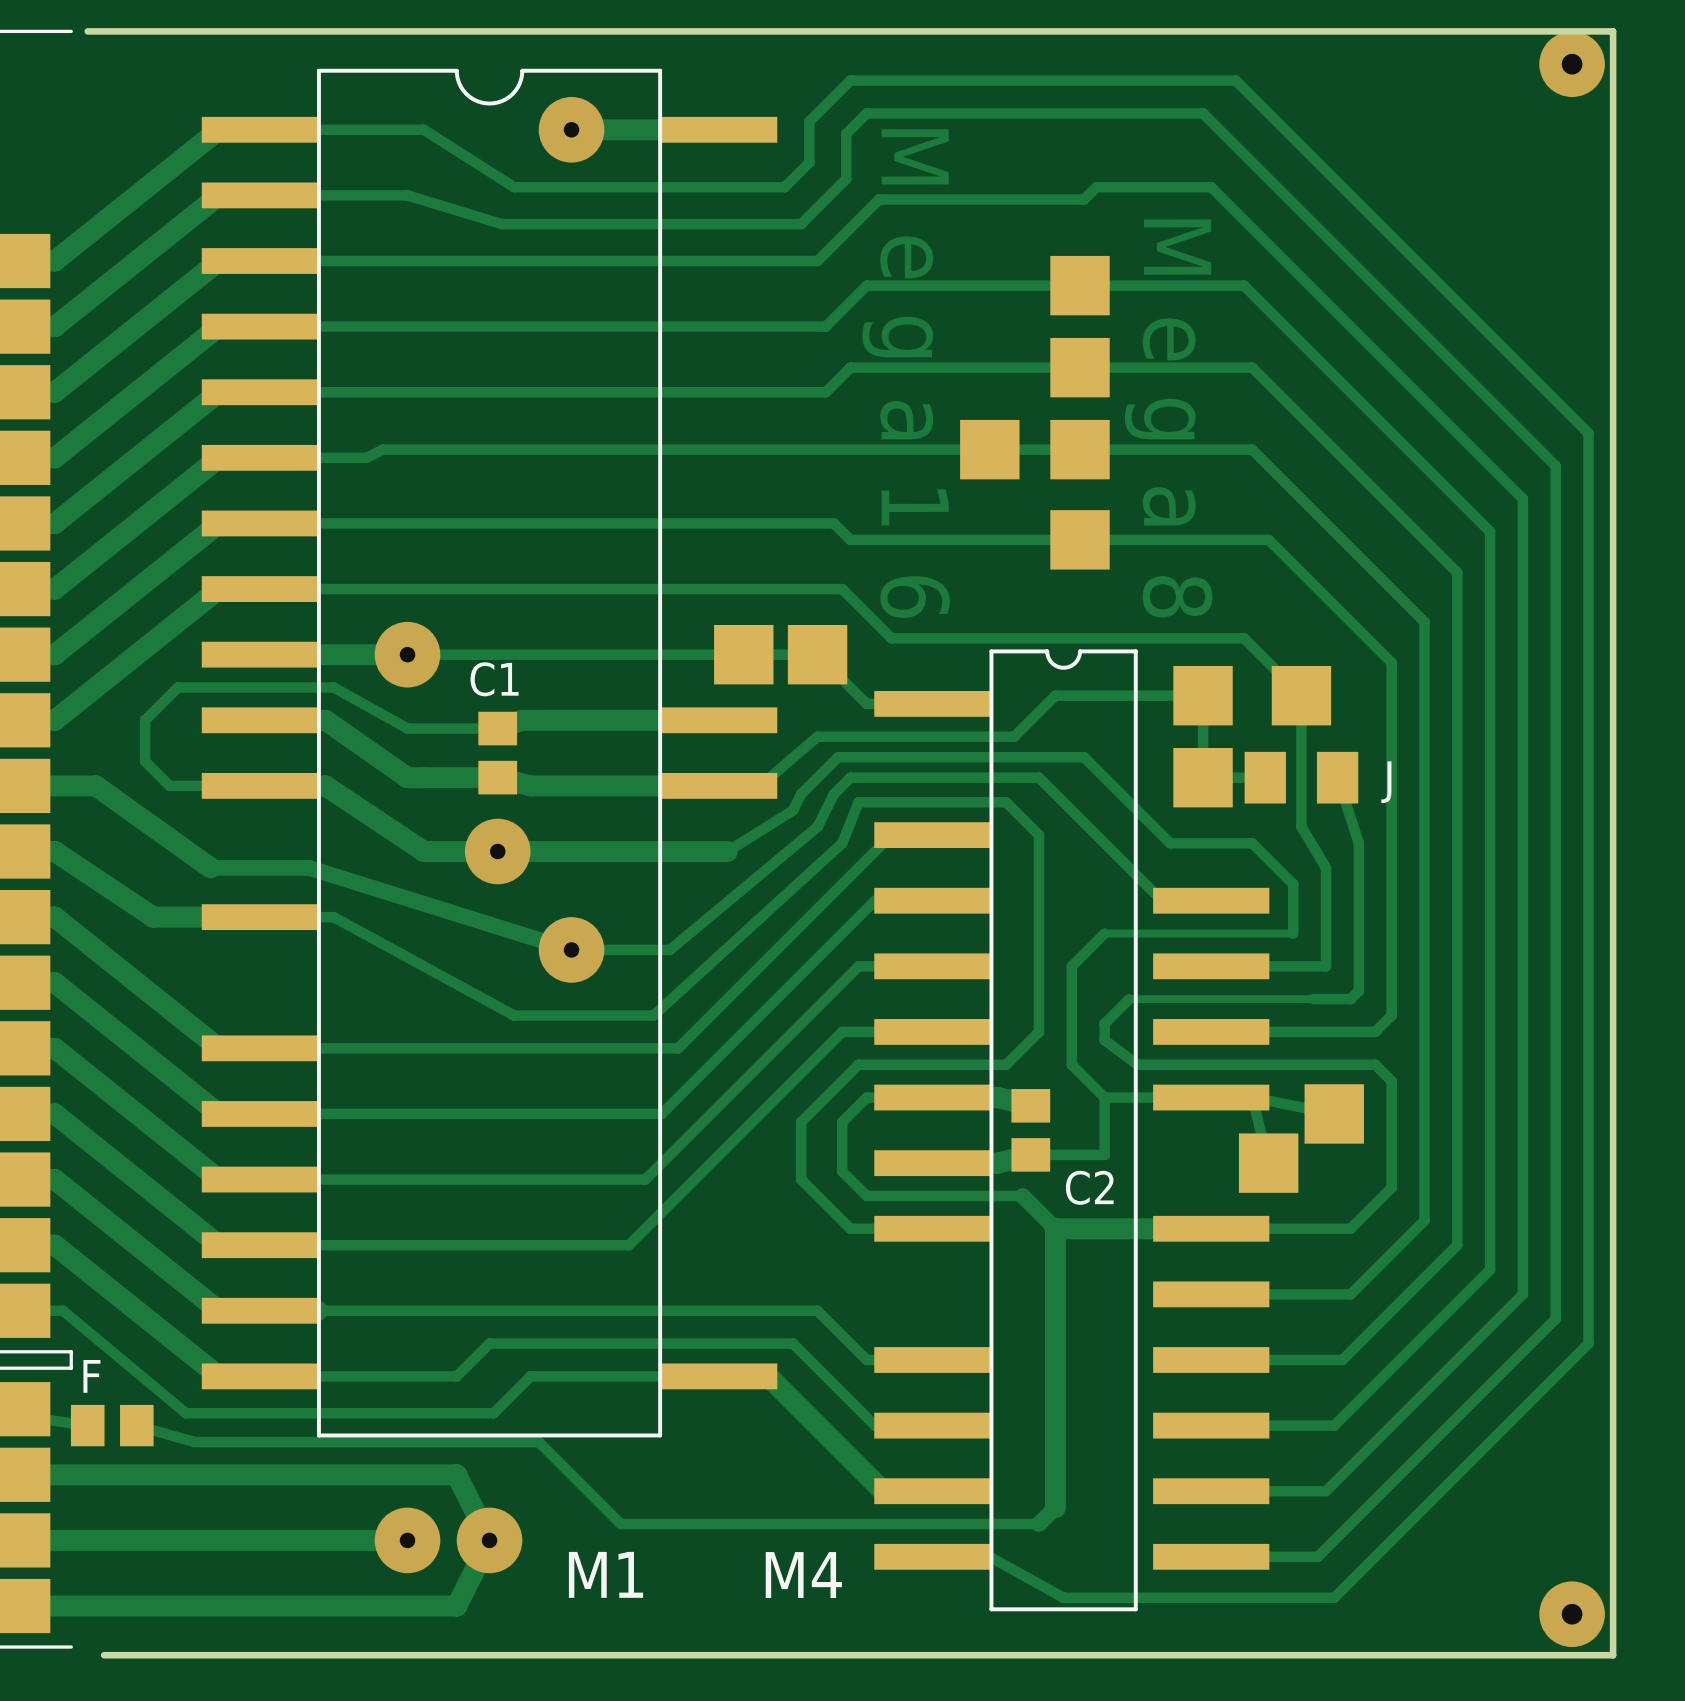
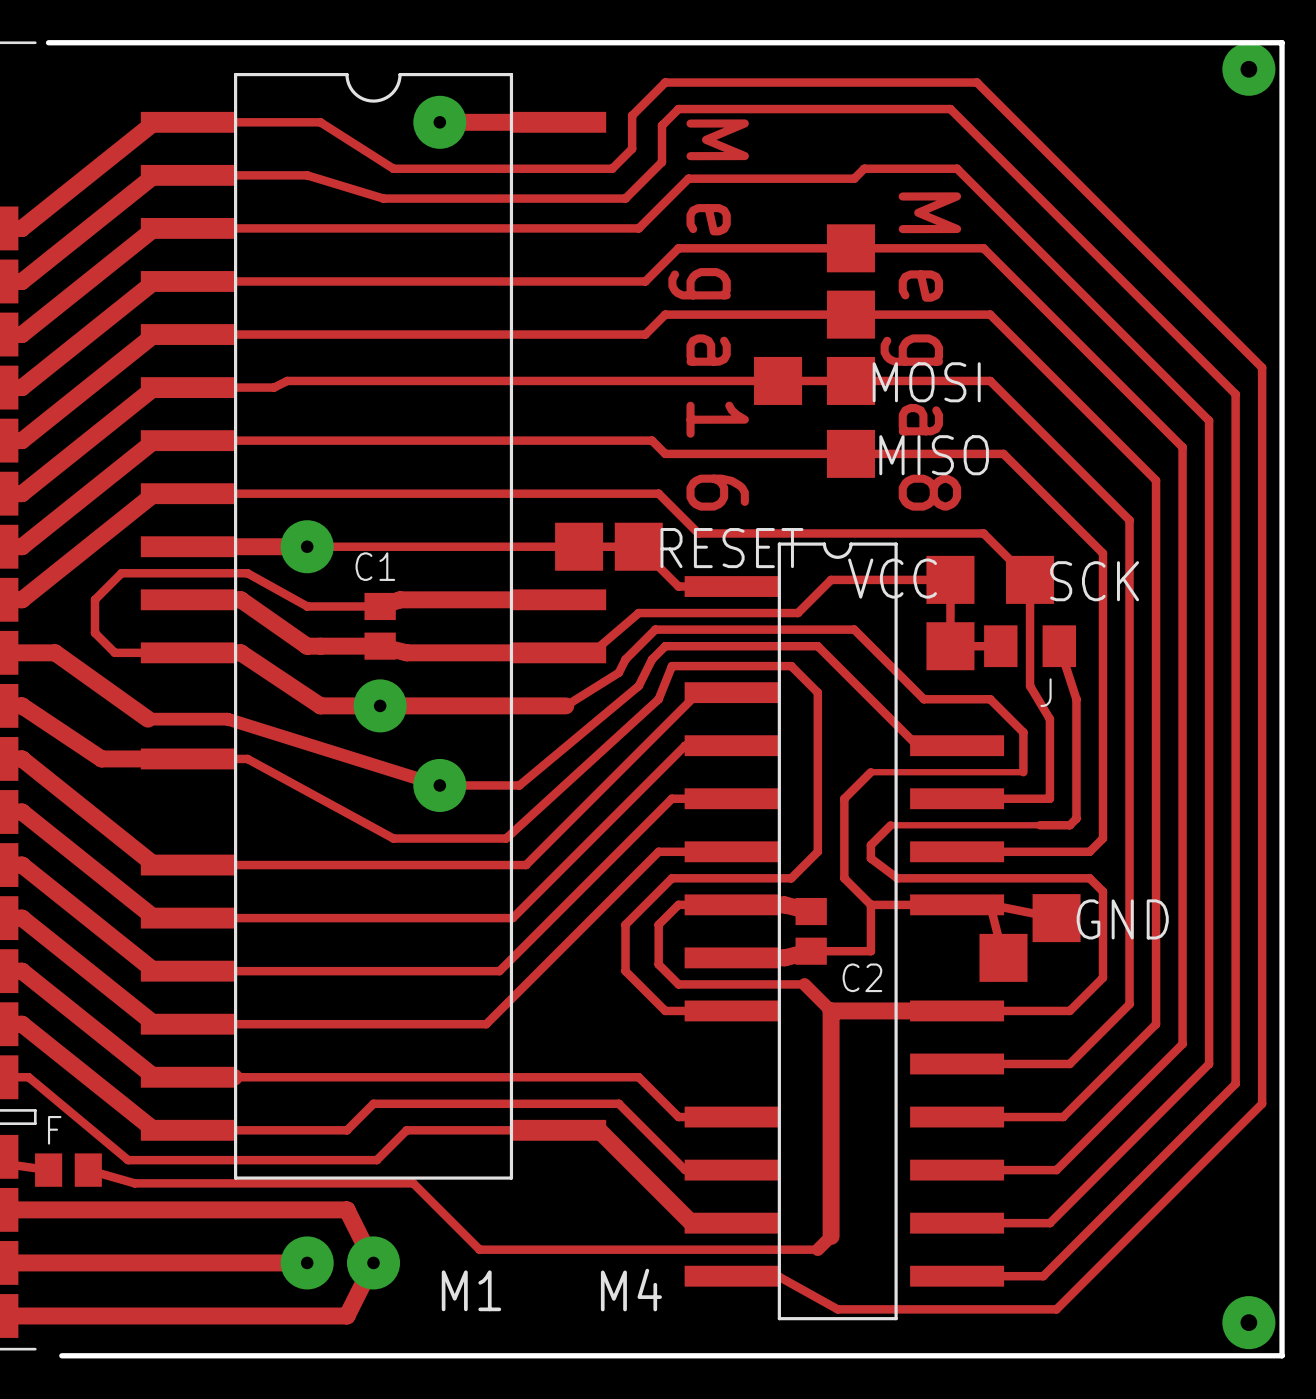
text: none -> MOSI (926, 382)
text: none -> MISO (934, 455)
text: none -> RESET (731, 548)
text: none -> VCC (892, 578)
text: none -> SCK (1094, 581)
J name position: J (1386, 782) -> J (1046, 692)
text: none -> GND (1122, 919)

